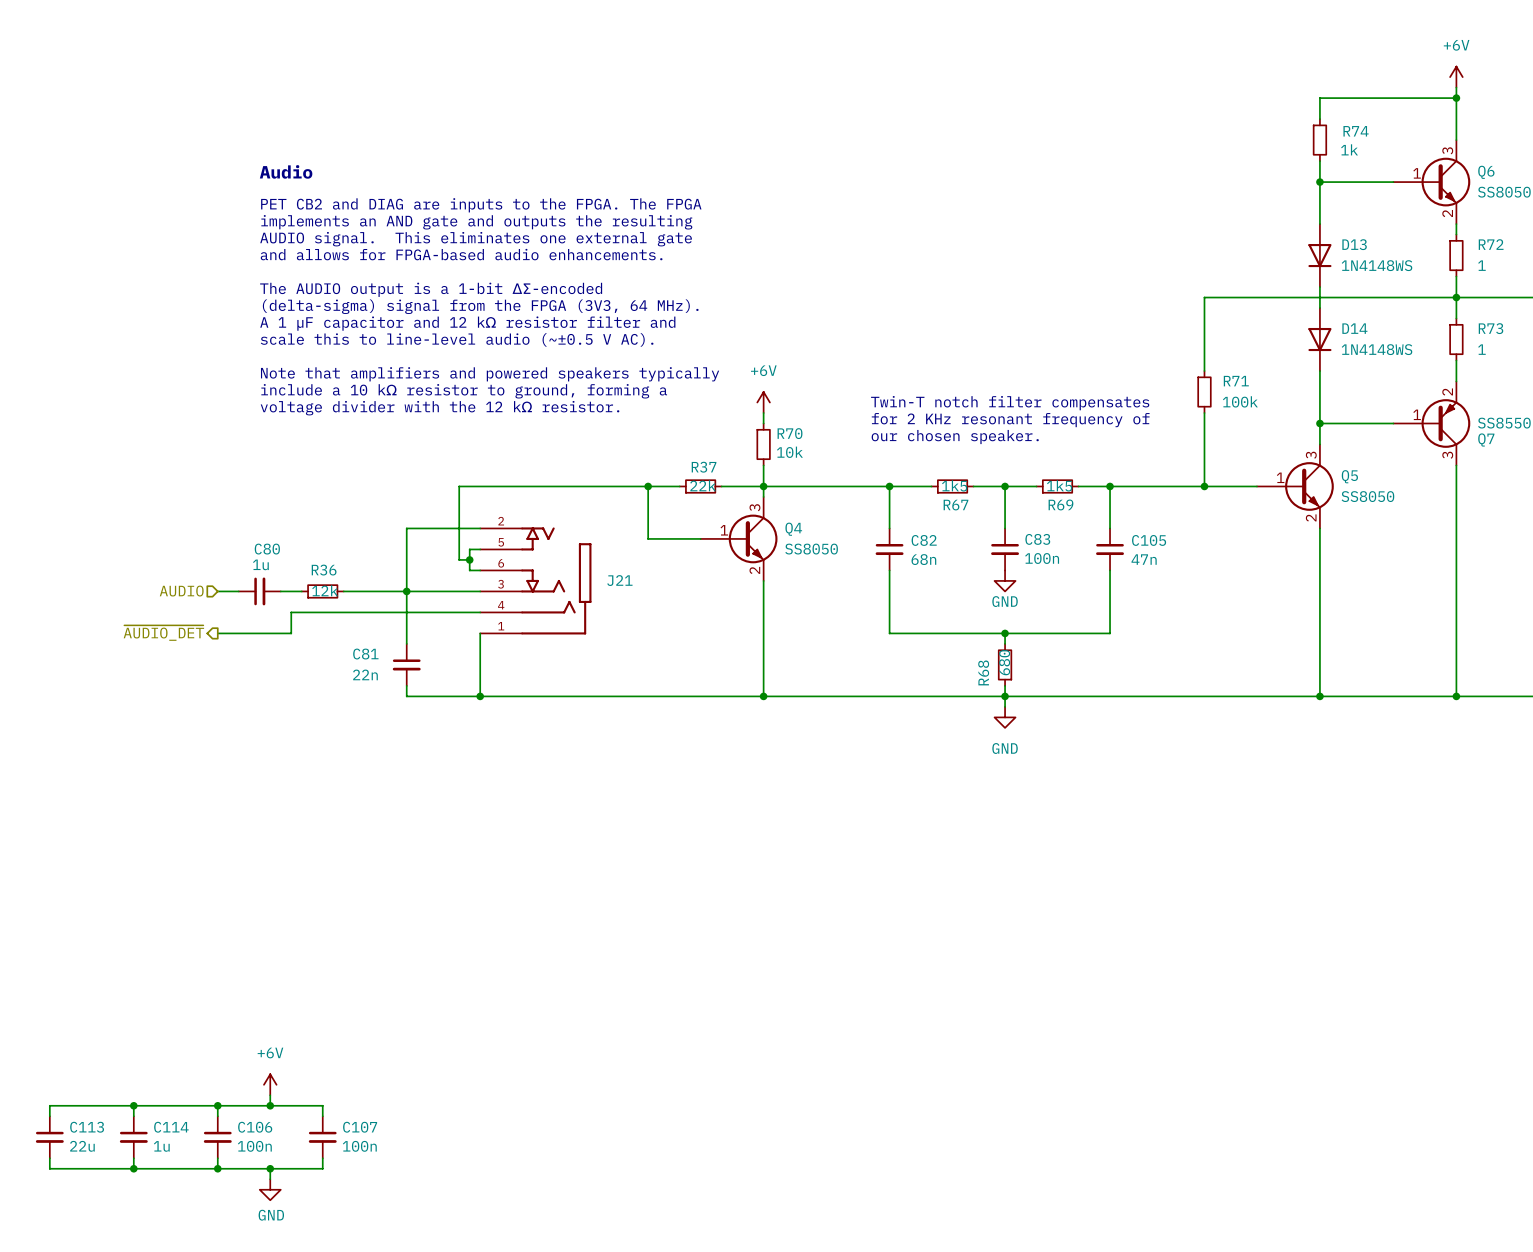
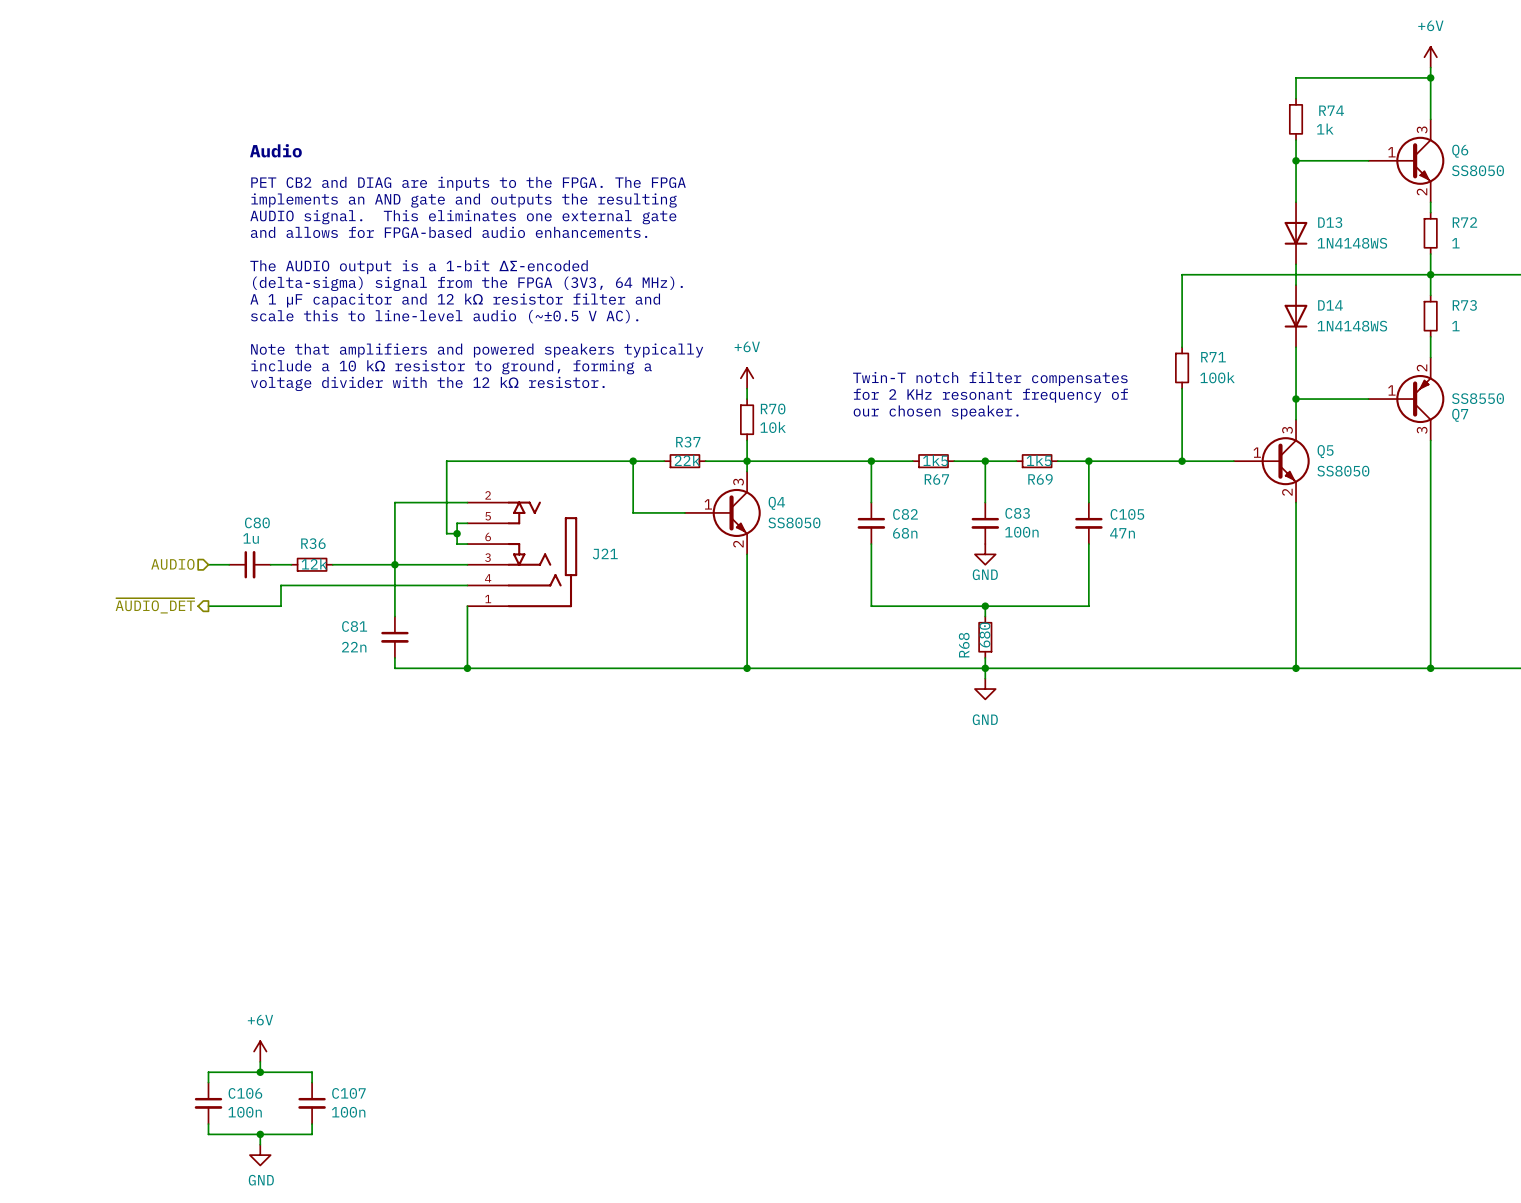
wire: (133, 1105) (133, 1116) -> none
junction: (133, 1105) -> none
wire: (217, 1105) (49, 1105) (49, 1116) -> none
junction: (217, 1105) -> none
C113: 22u (49, 1137) -> none
C114: 1u (133, 1137) -> none
wire: (49, 1158) (49, 1168) (217, 1168) -> none
wire: (133, 1158) (133, 1168) -> none
junction: (133, 1168) -> none
junction: (217, 1168) -> none

